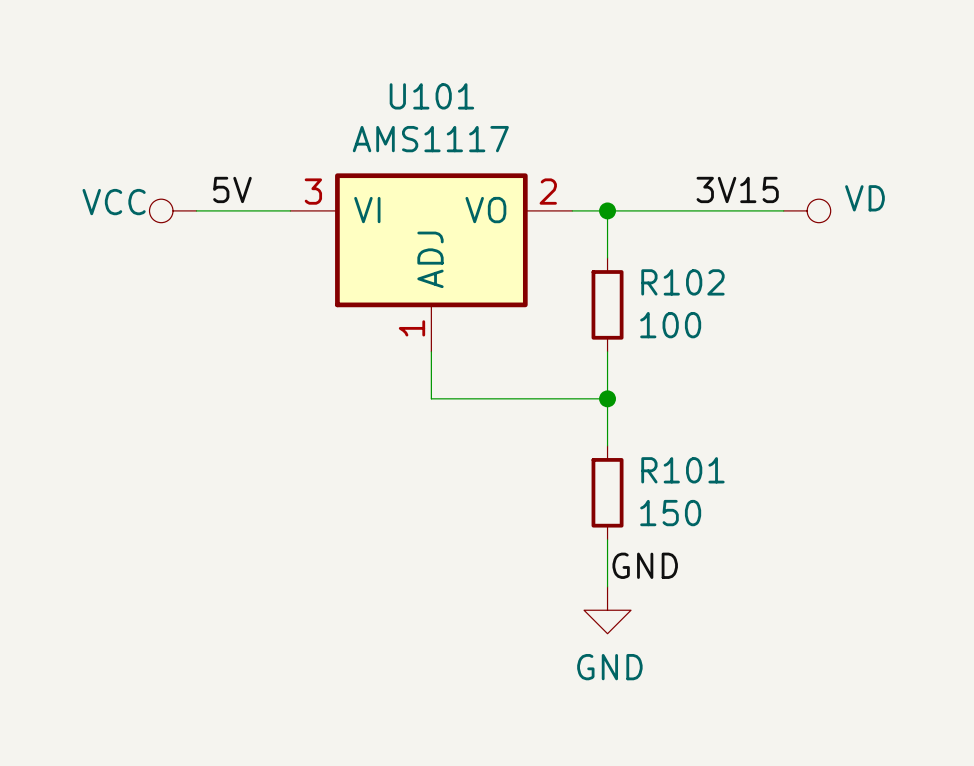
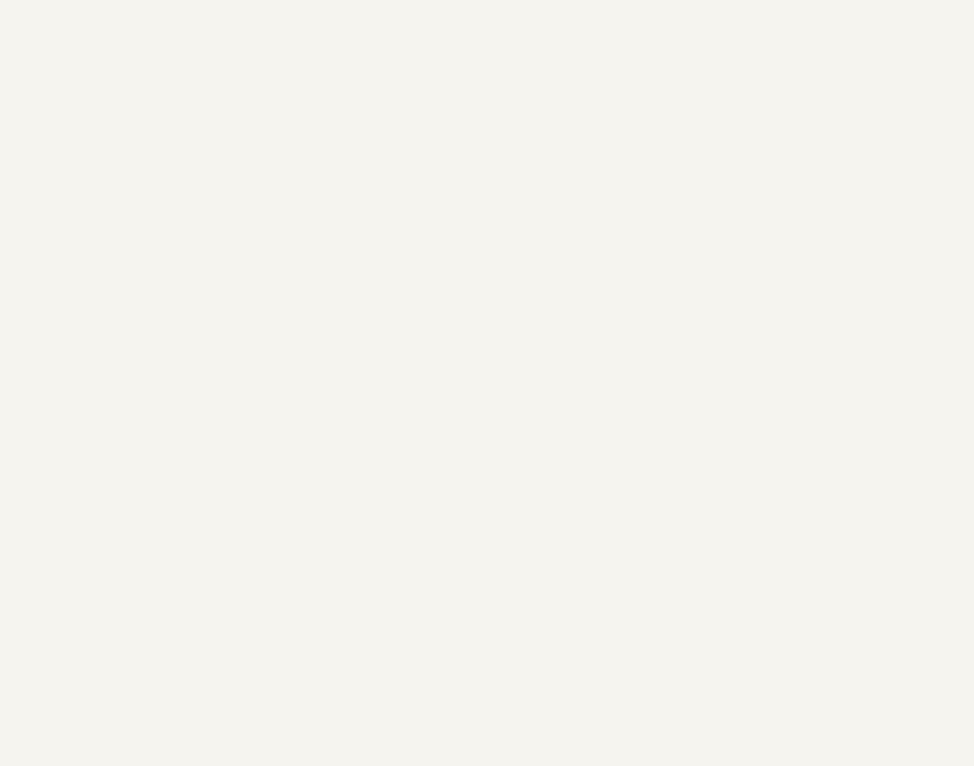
label: 5V (232, 189) -> none
label: 3V15 (737, 189) -> none
power symbol: VCC (172, 210) -> none
wire: (196, 210) (290, 210) -> none
wire: (572, 210) (783, 210) -> none
wire: (607, 210) (607, 257) -> none
junction: (607, 210) -> none
power symbol: VD (807, 210) -> none
U101: AMS1117 (431, 262) -> none
R102: 100 (607, 304) -> none
wire: (431, 351) (431, 398) (607, 398) -> none
wire: (607, 351) (607, 445) -> none
junction: (607, 398) -> none
R101: 150 (607, 492) -> none
wire: (607, 539) (607, 586) -> none
label: GND (645, 565) -> none
power symbol: GND (607, 610) -> none

